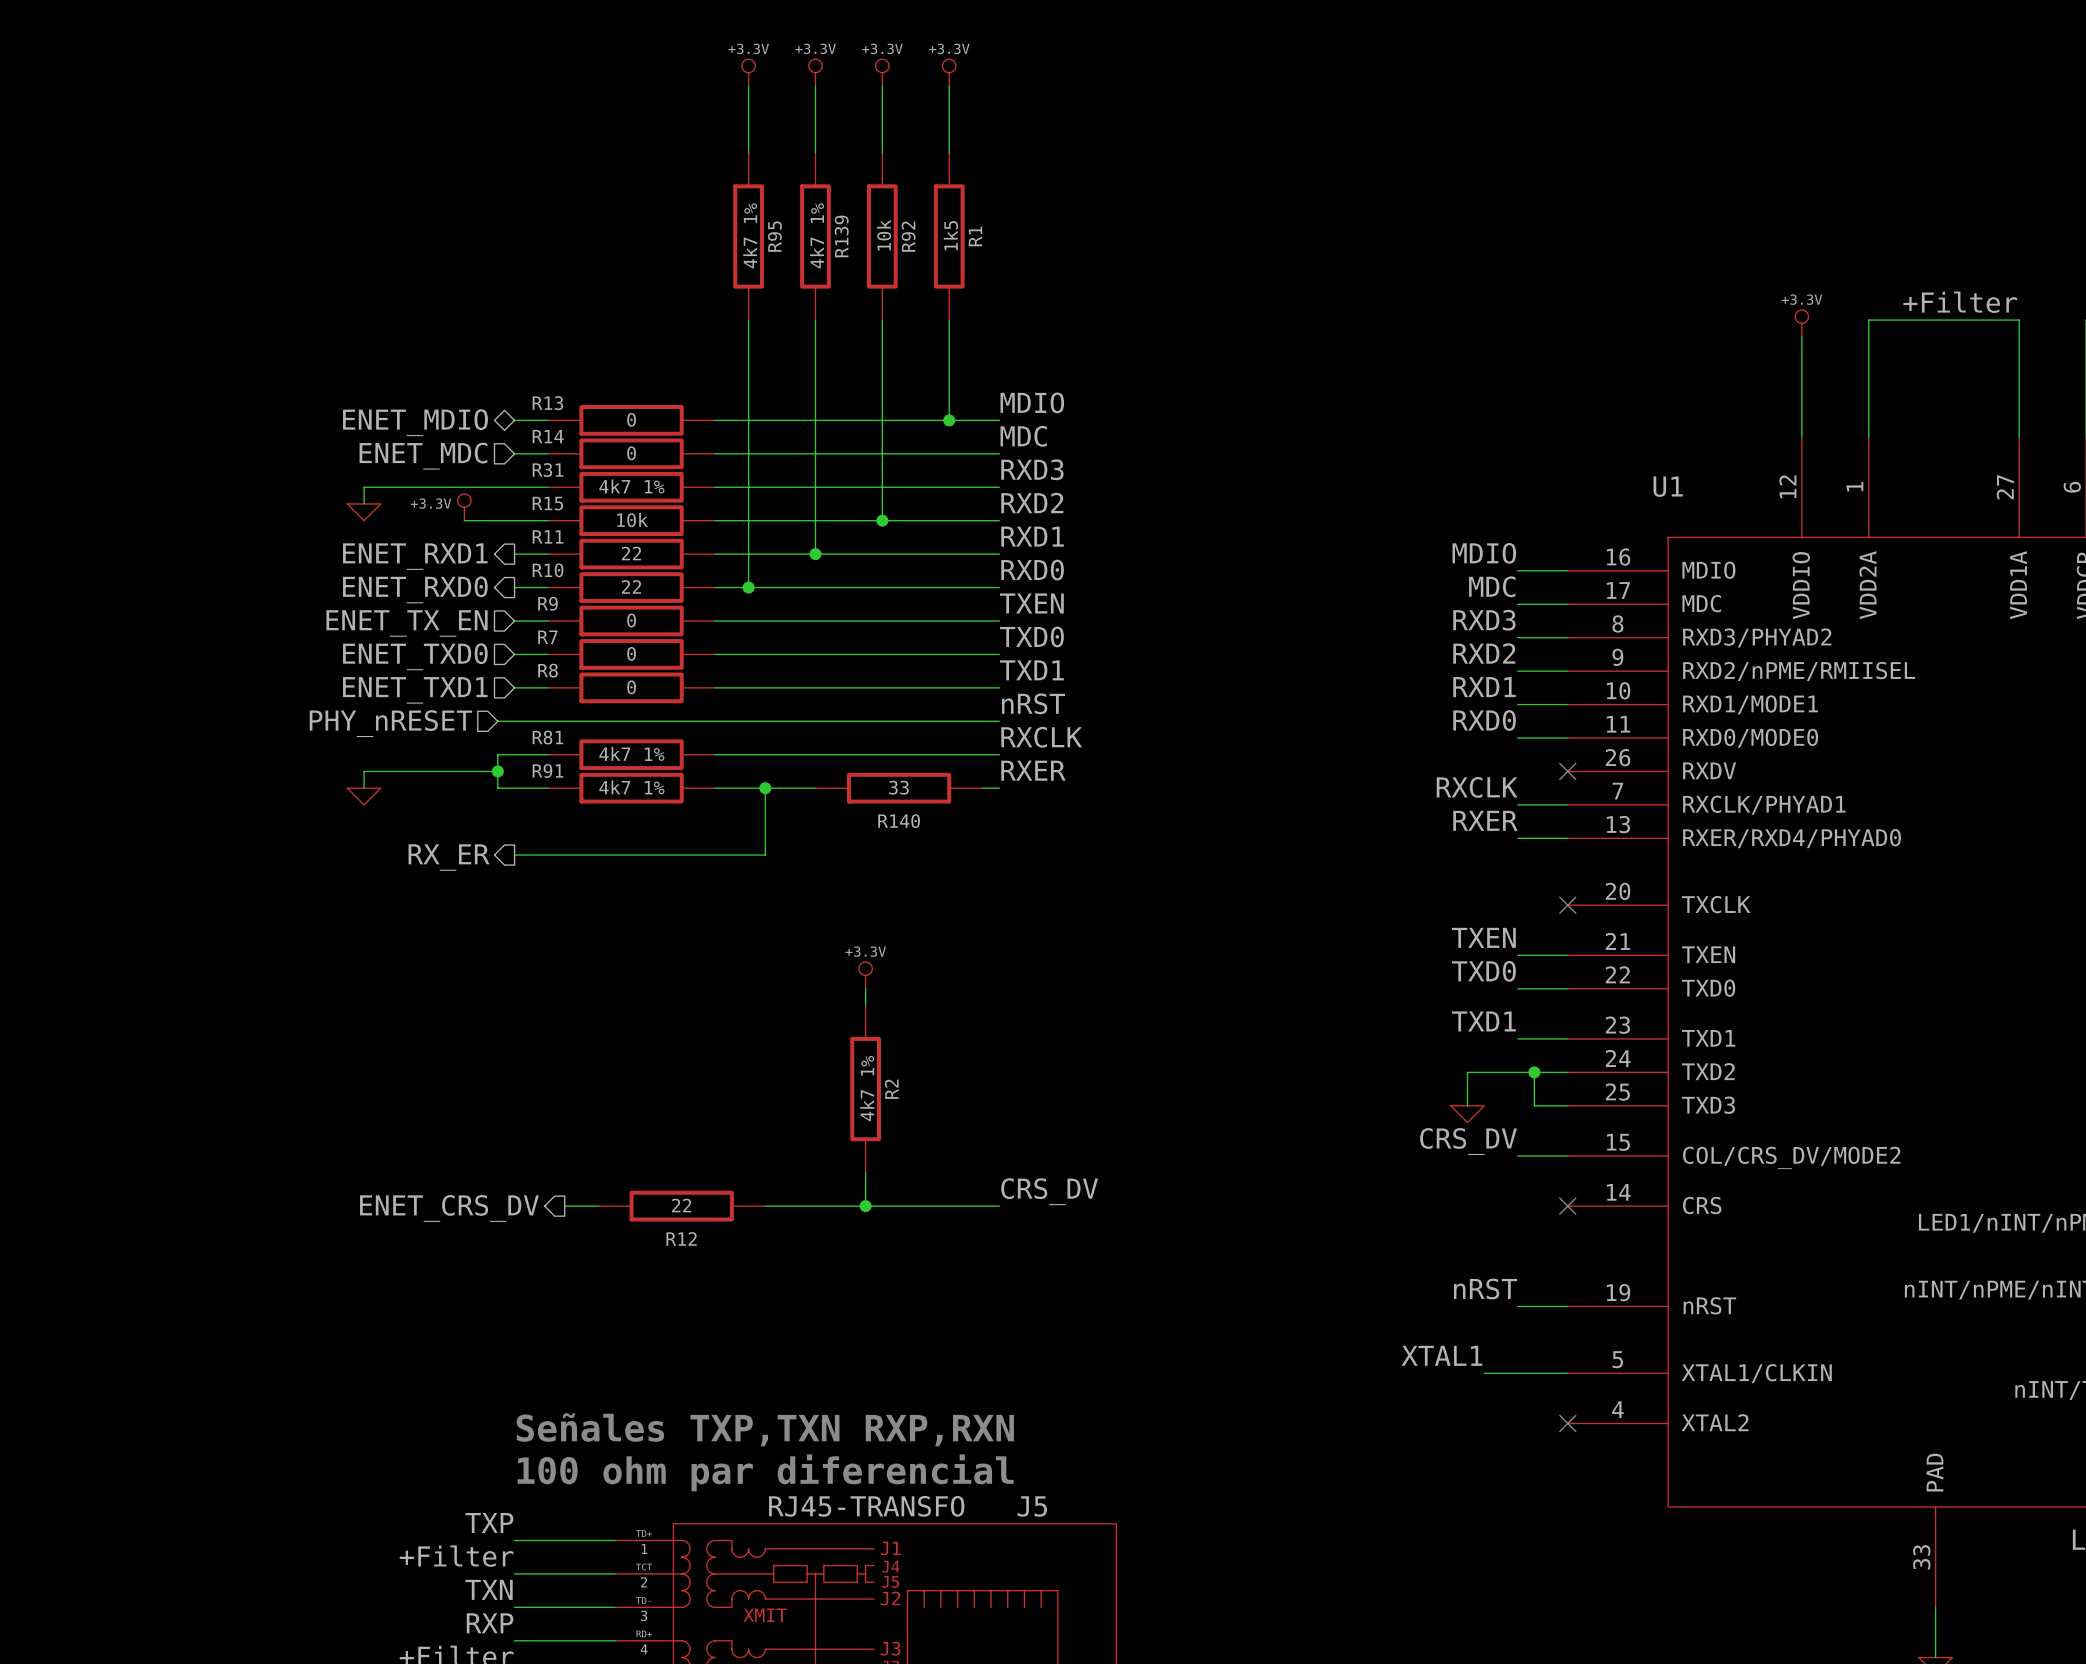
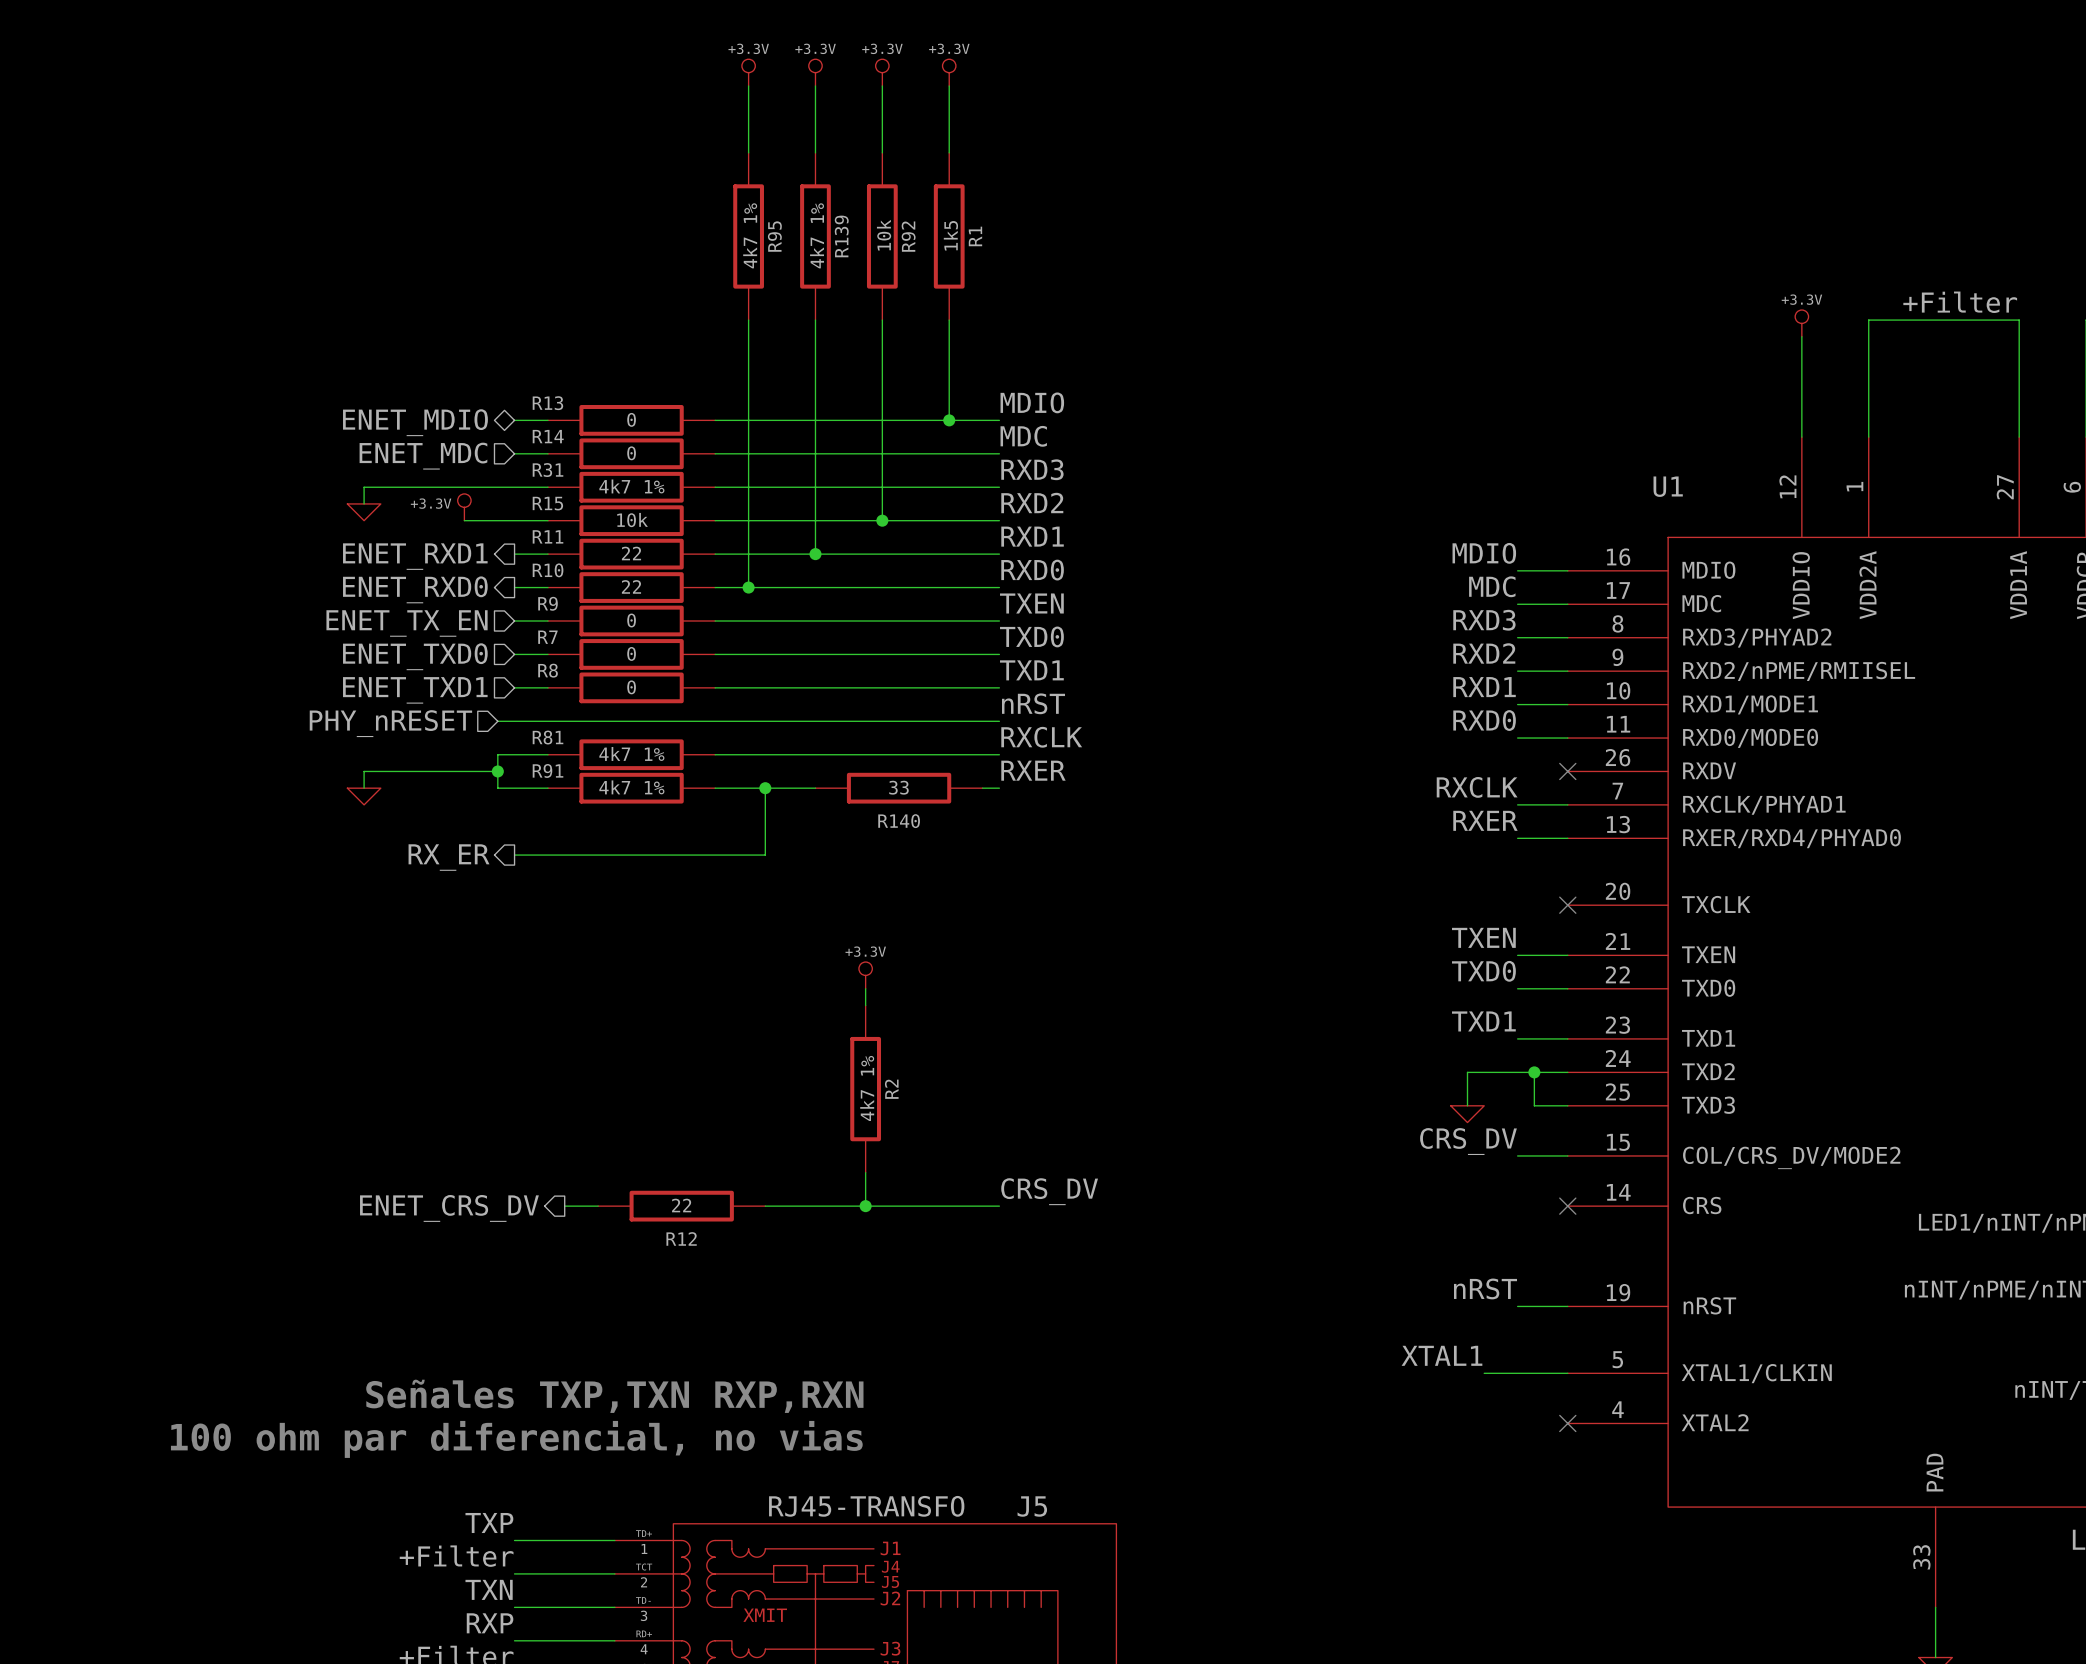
text position: Señales TXP,TXN RXP,RXN (765, 1429) -> Señales TXP,TXN RXP,RXN (614, 1396)
text: 100 ohm par diferencial (765, 1472) -> 100 ohm par diferencial, no vias (516, 1439)

